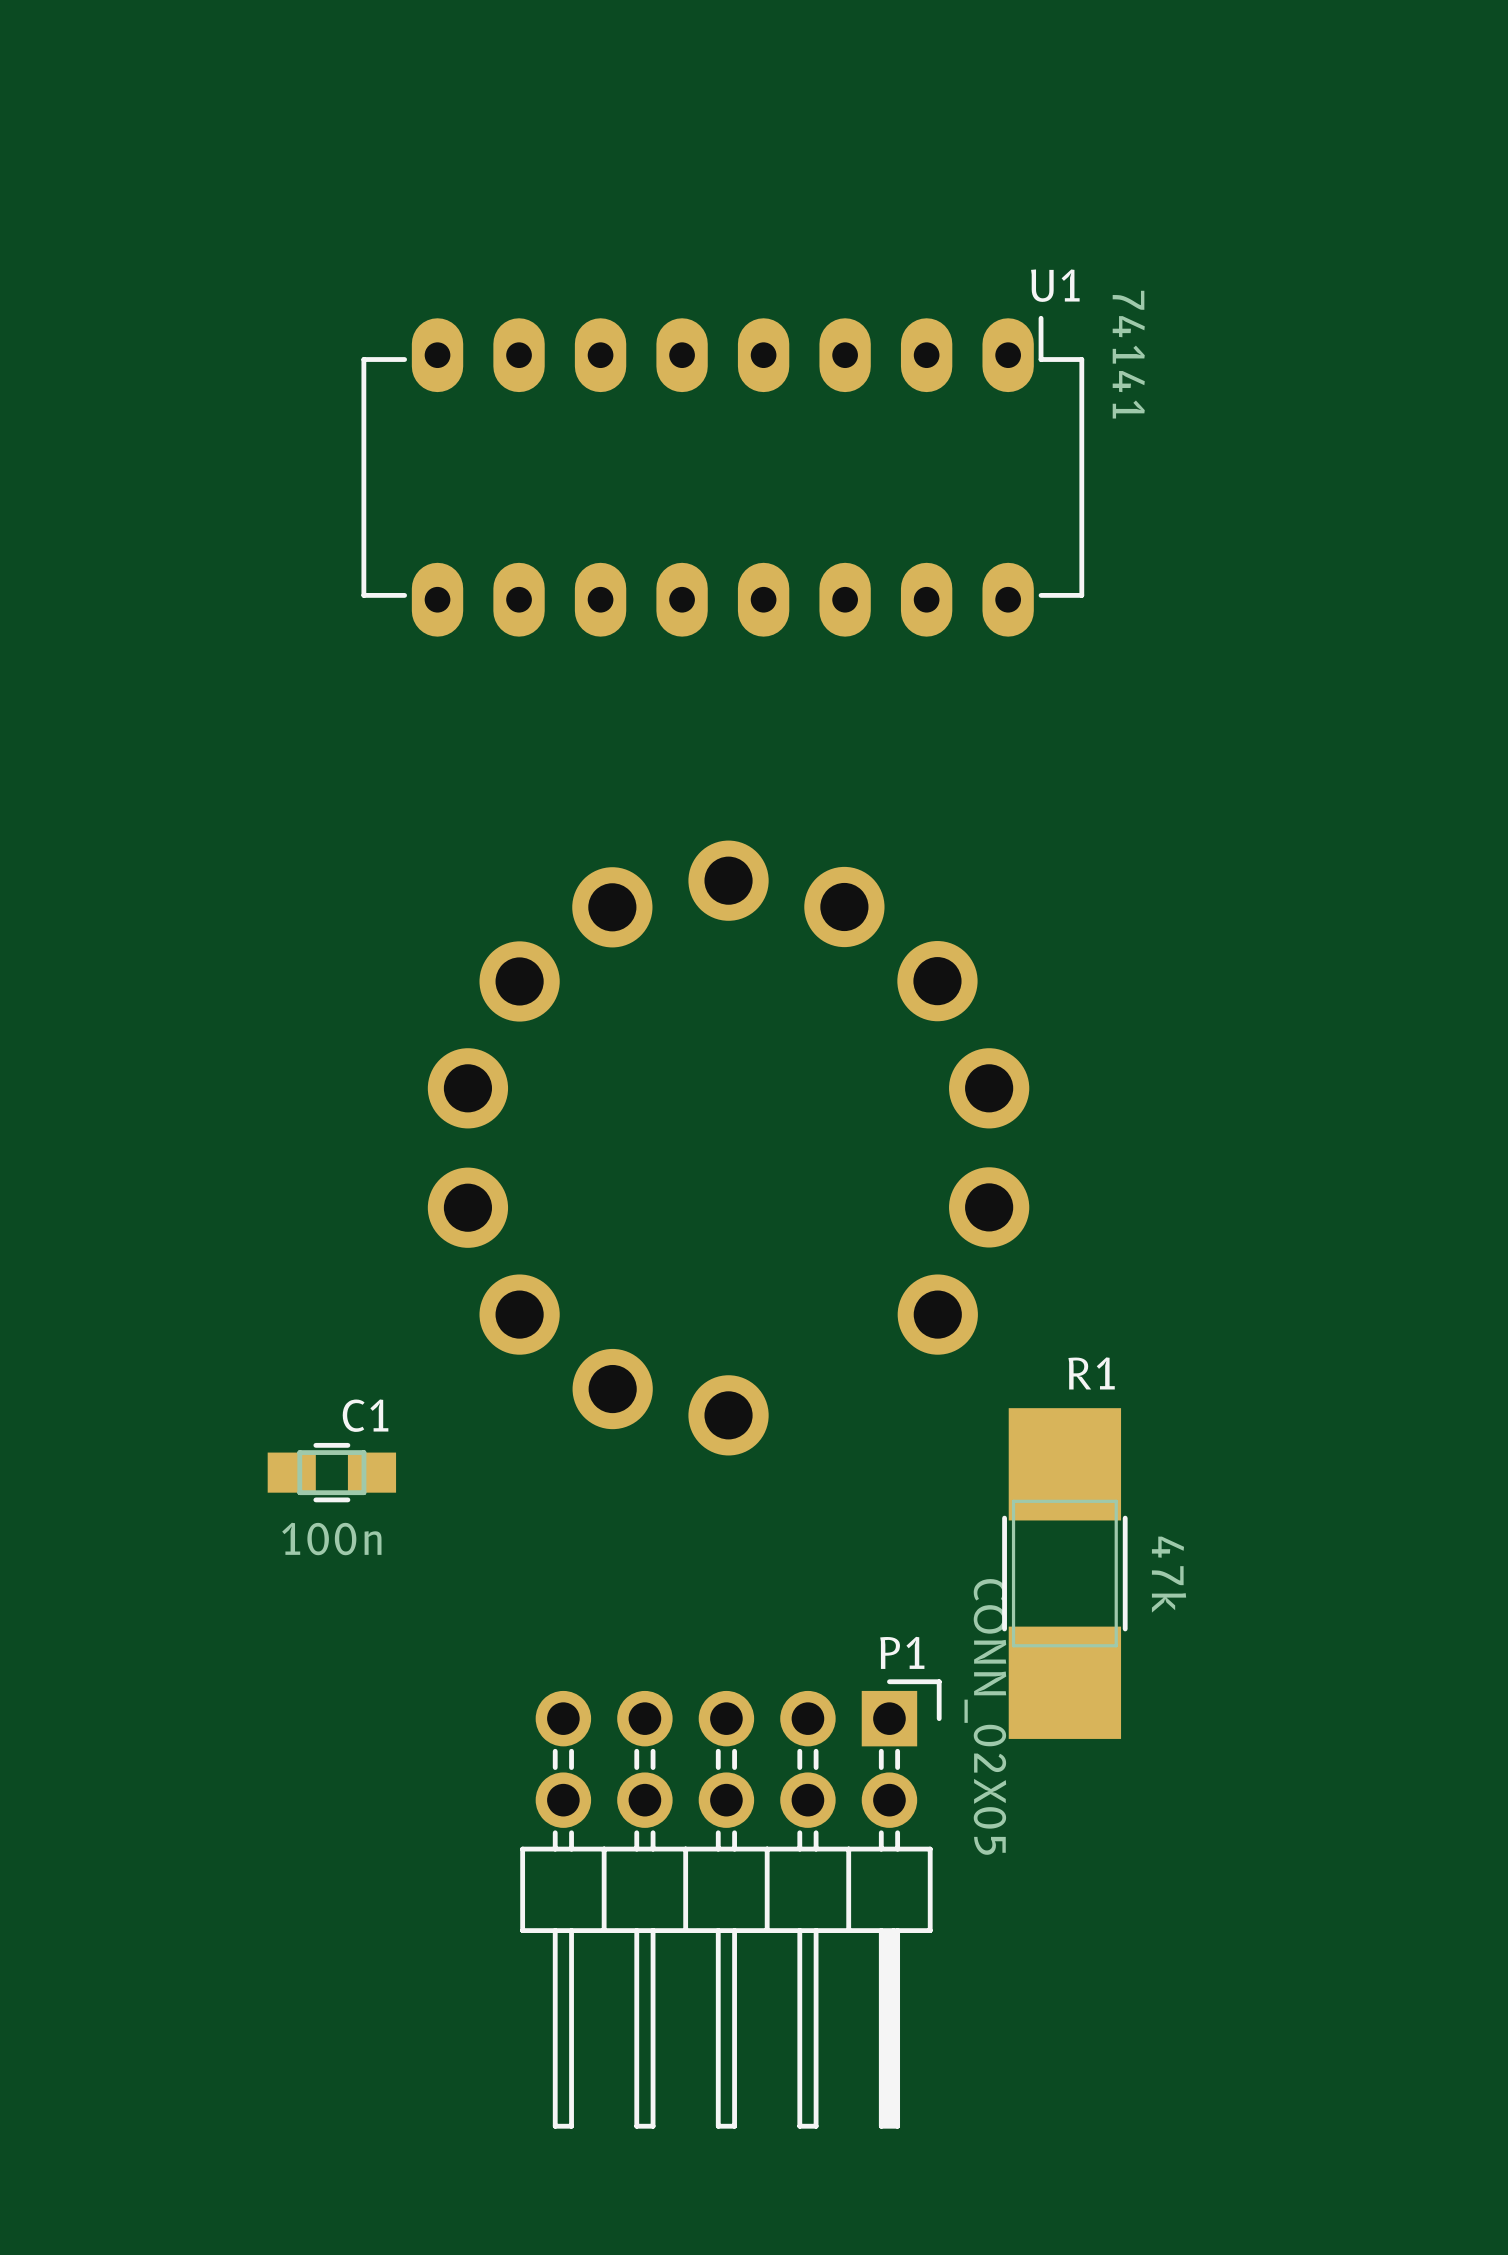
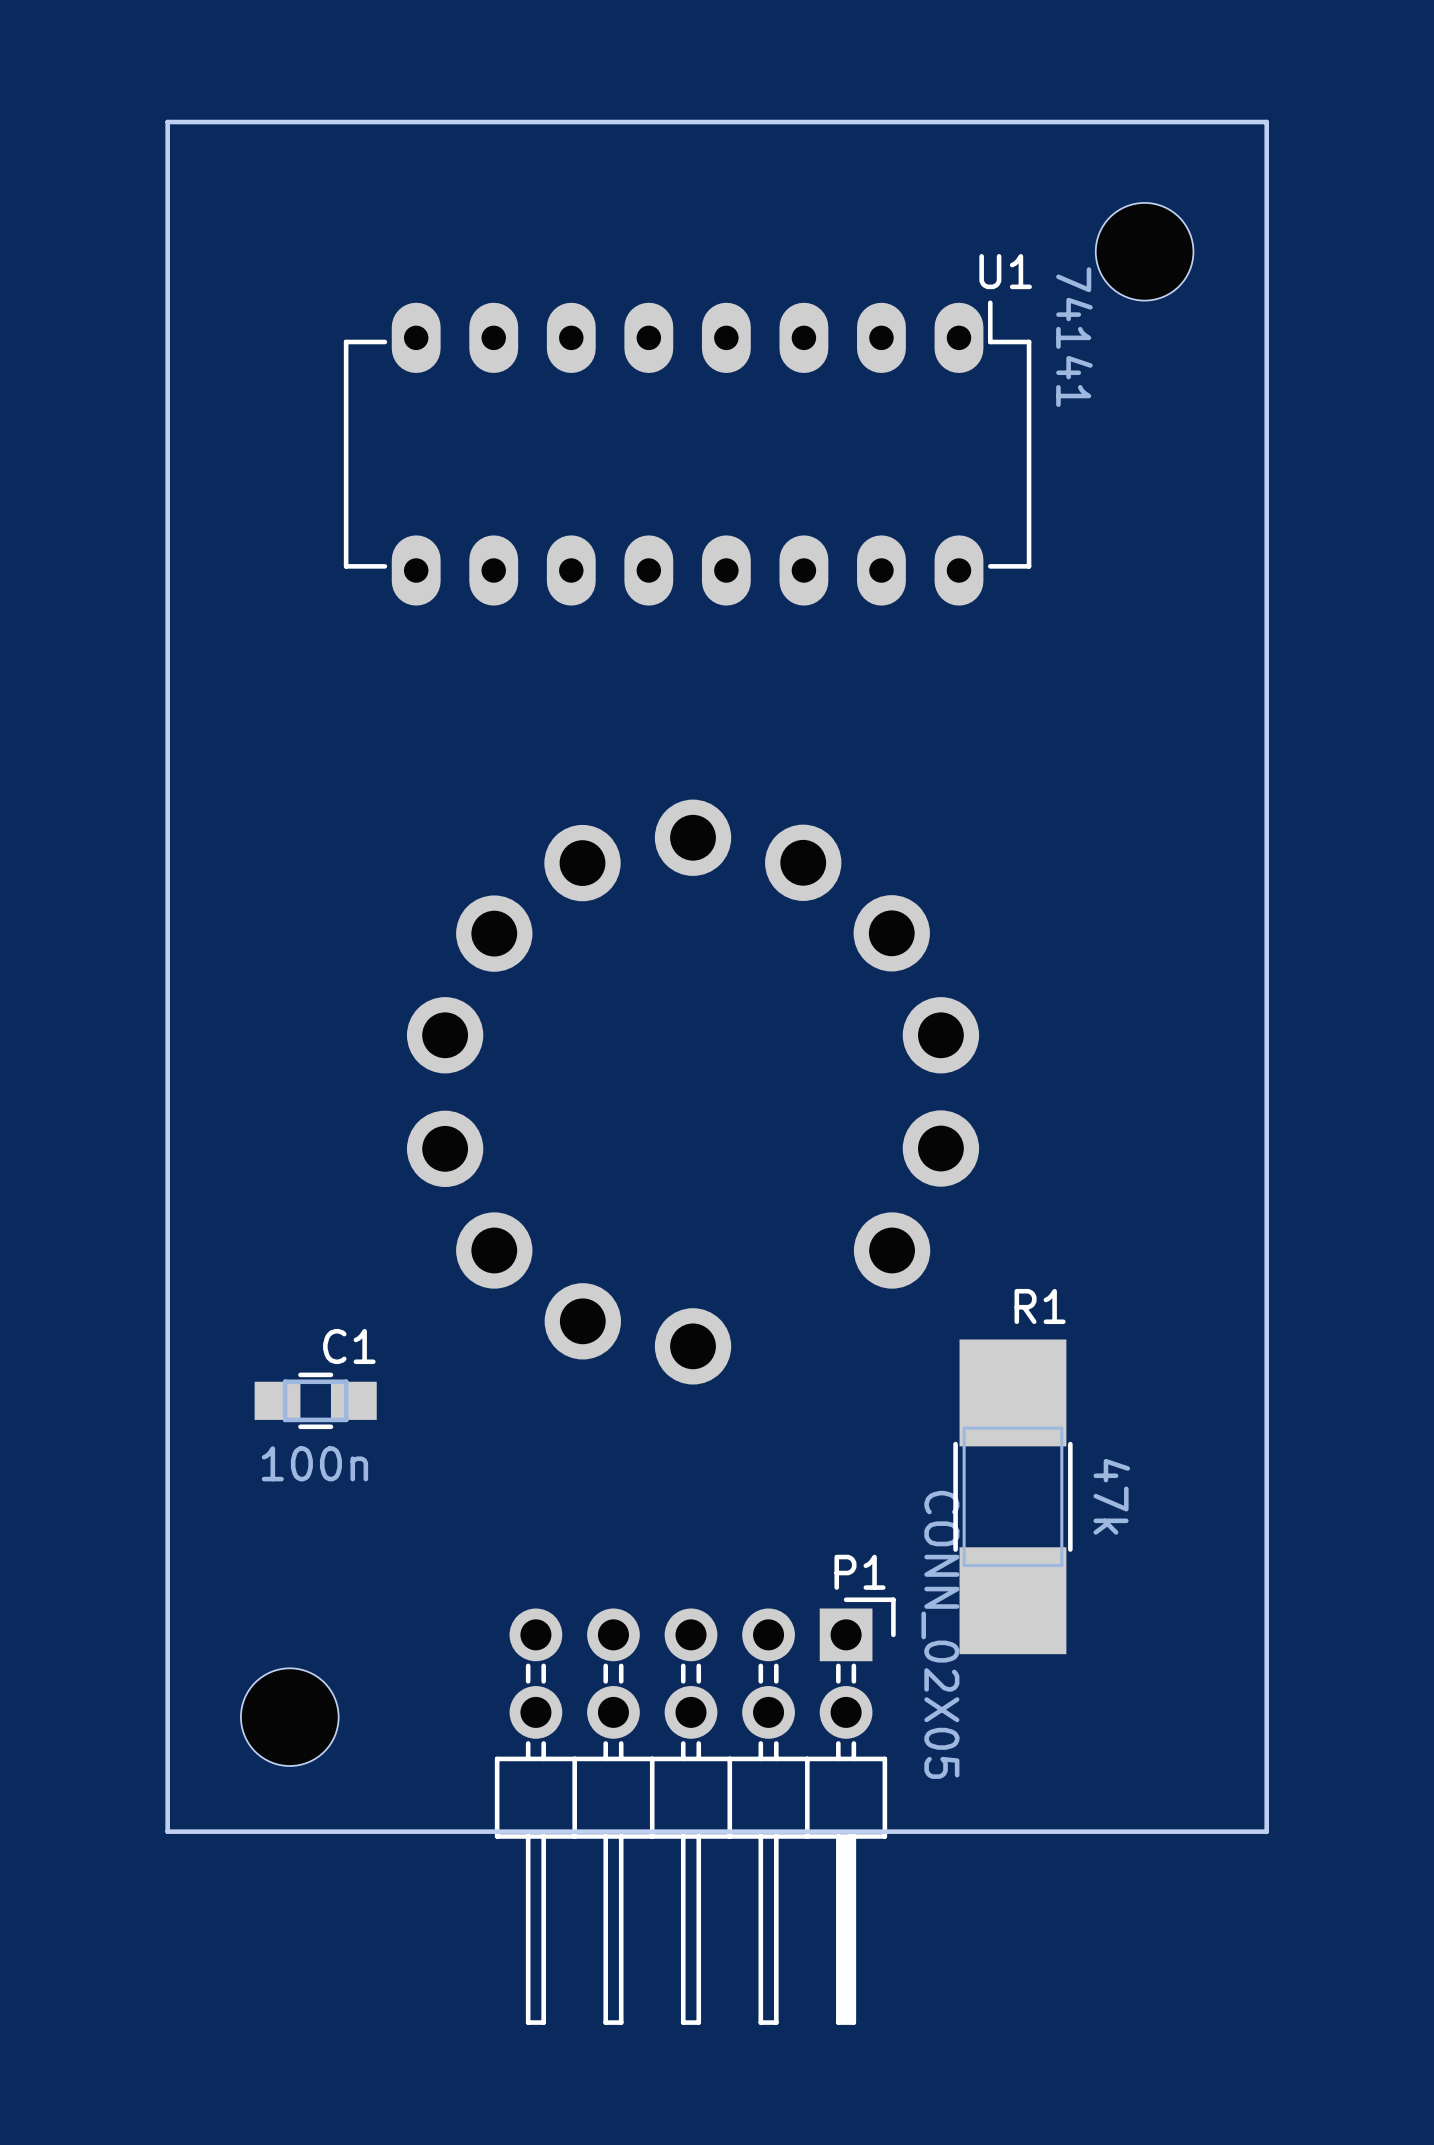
board edge: none -> (1266, 122) (1266, 1831) (167, 1831) (167, 122) (1266, 122)
part: none -> (1144, 251)
part: none -> (289, 1717)

